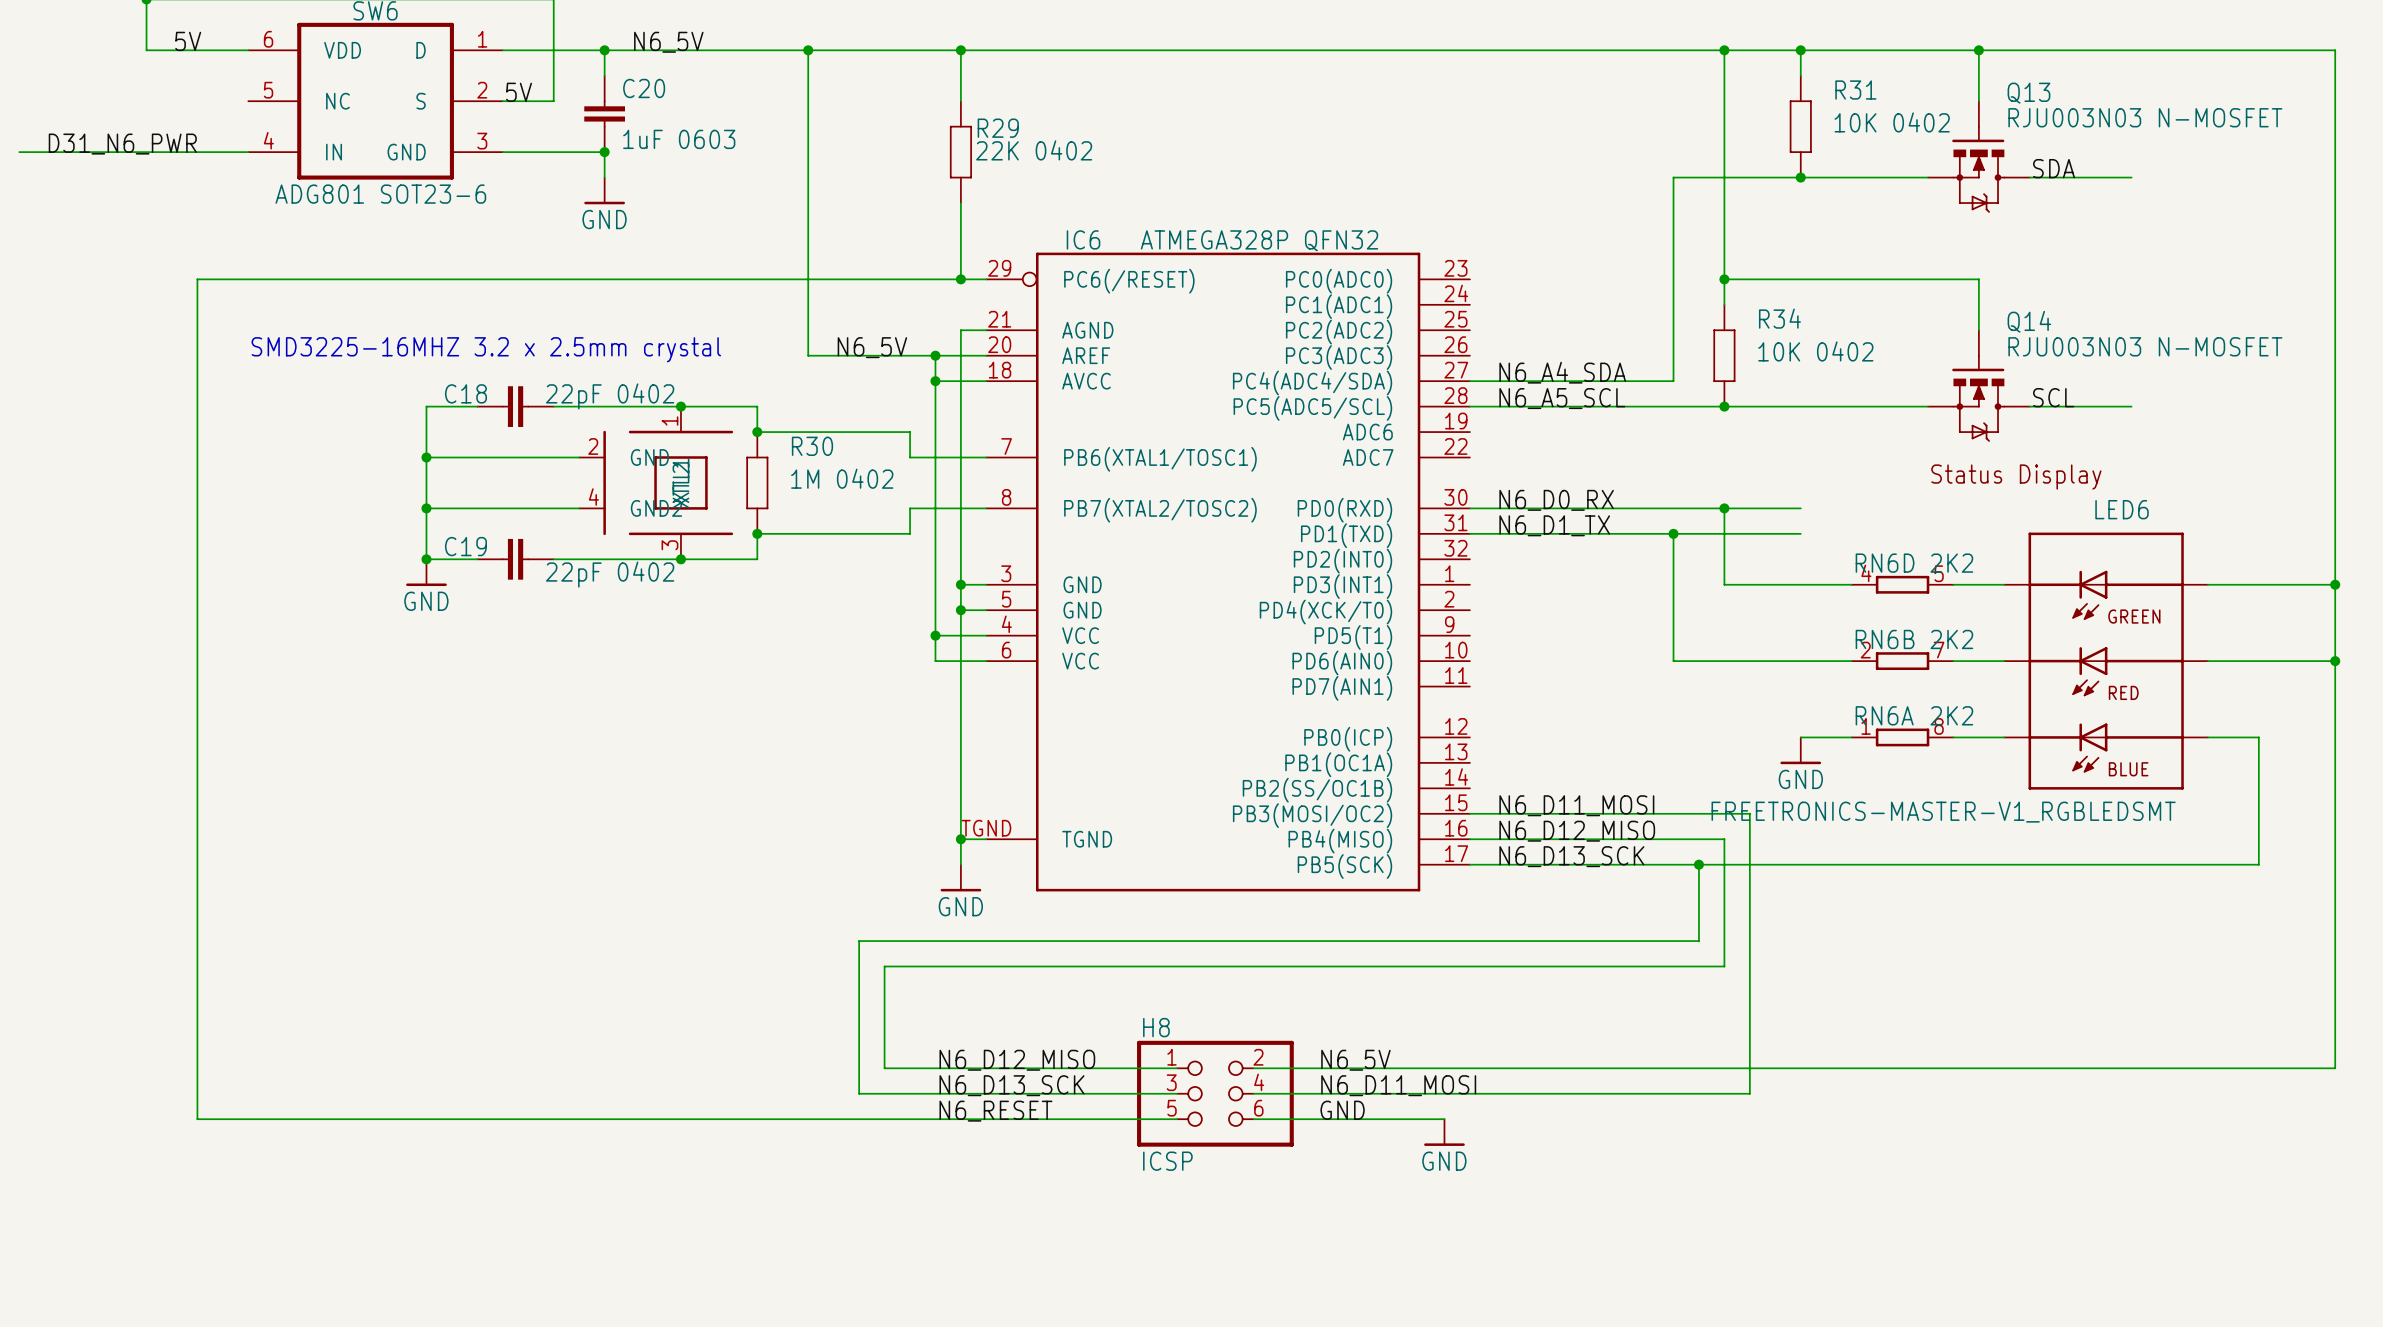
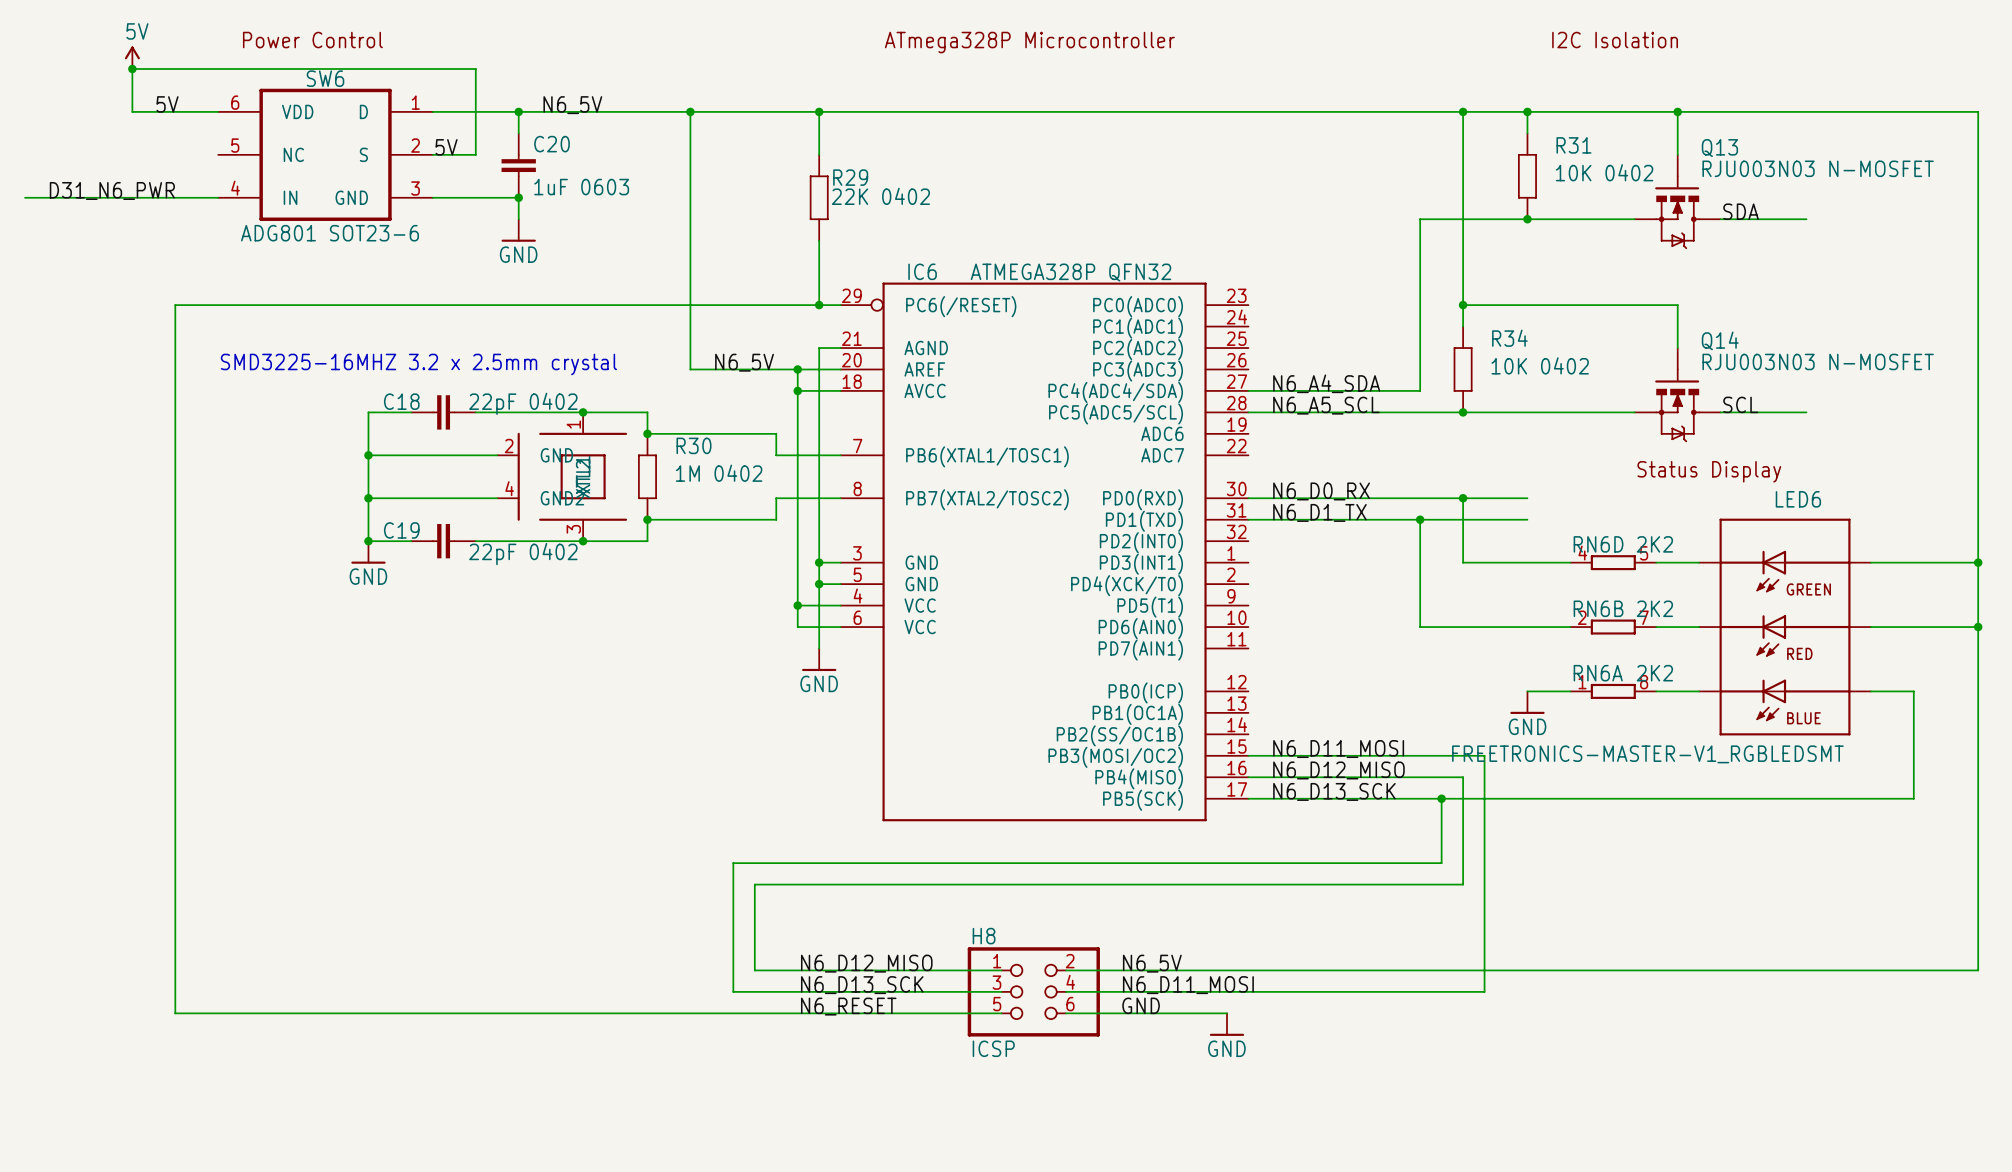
IC6 symbol: [986, 252, 1470, 892] -> [840, 282, 1249, 822]
wire: (960, 686) (960, 864) -> none
wire: (960, 839) (986, 839) -> none
junction: (960, 839) -> none
power symbol position: GND (960, 878) -> GND (819, 659)

